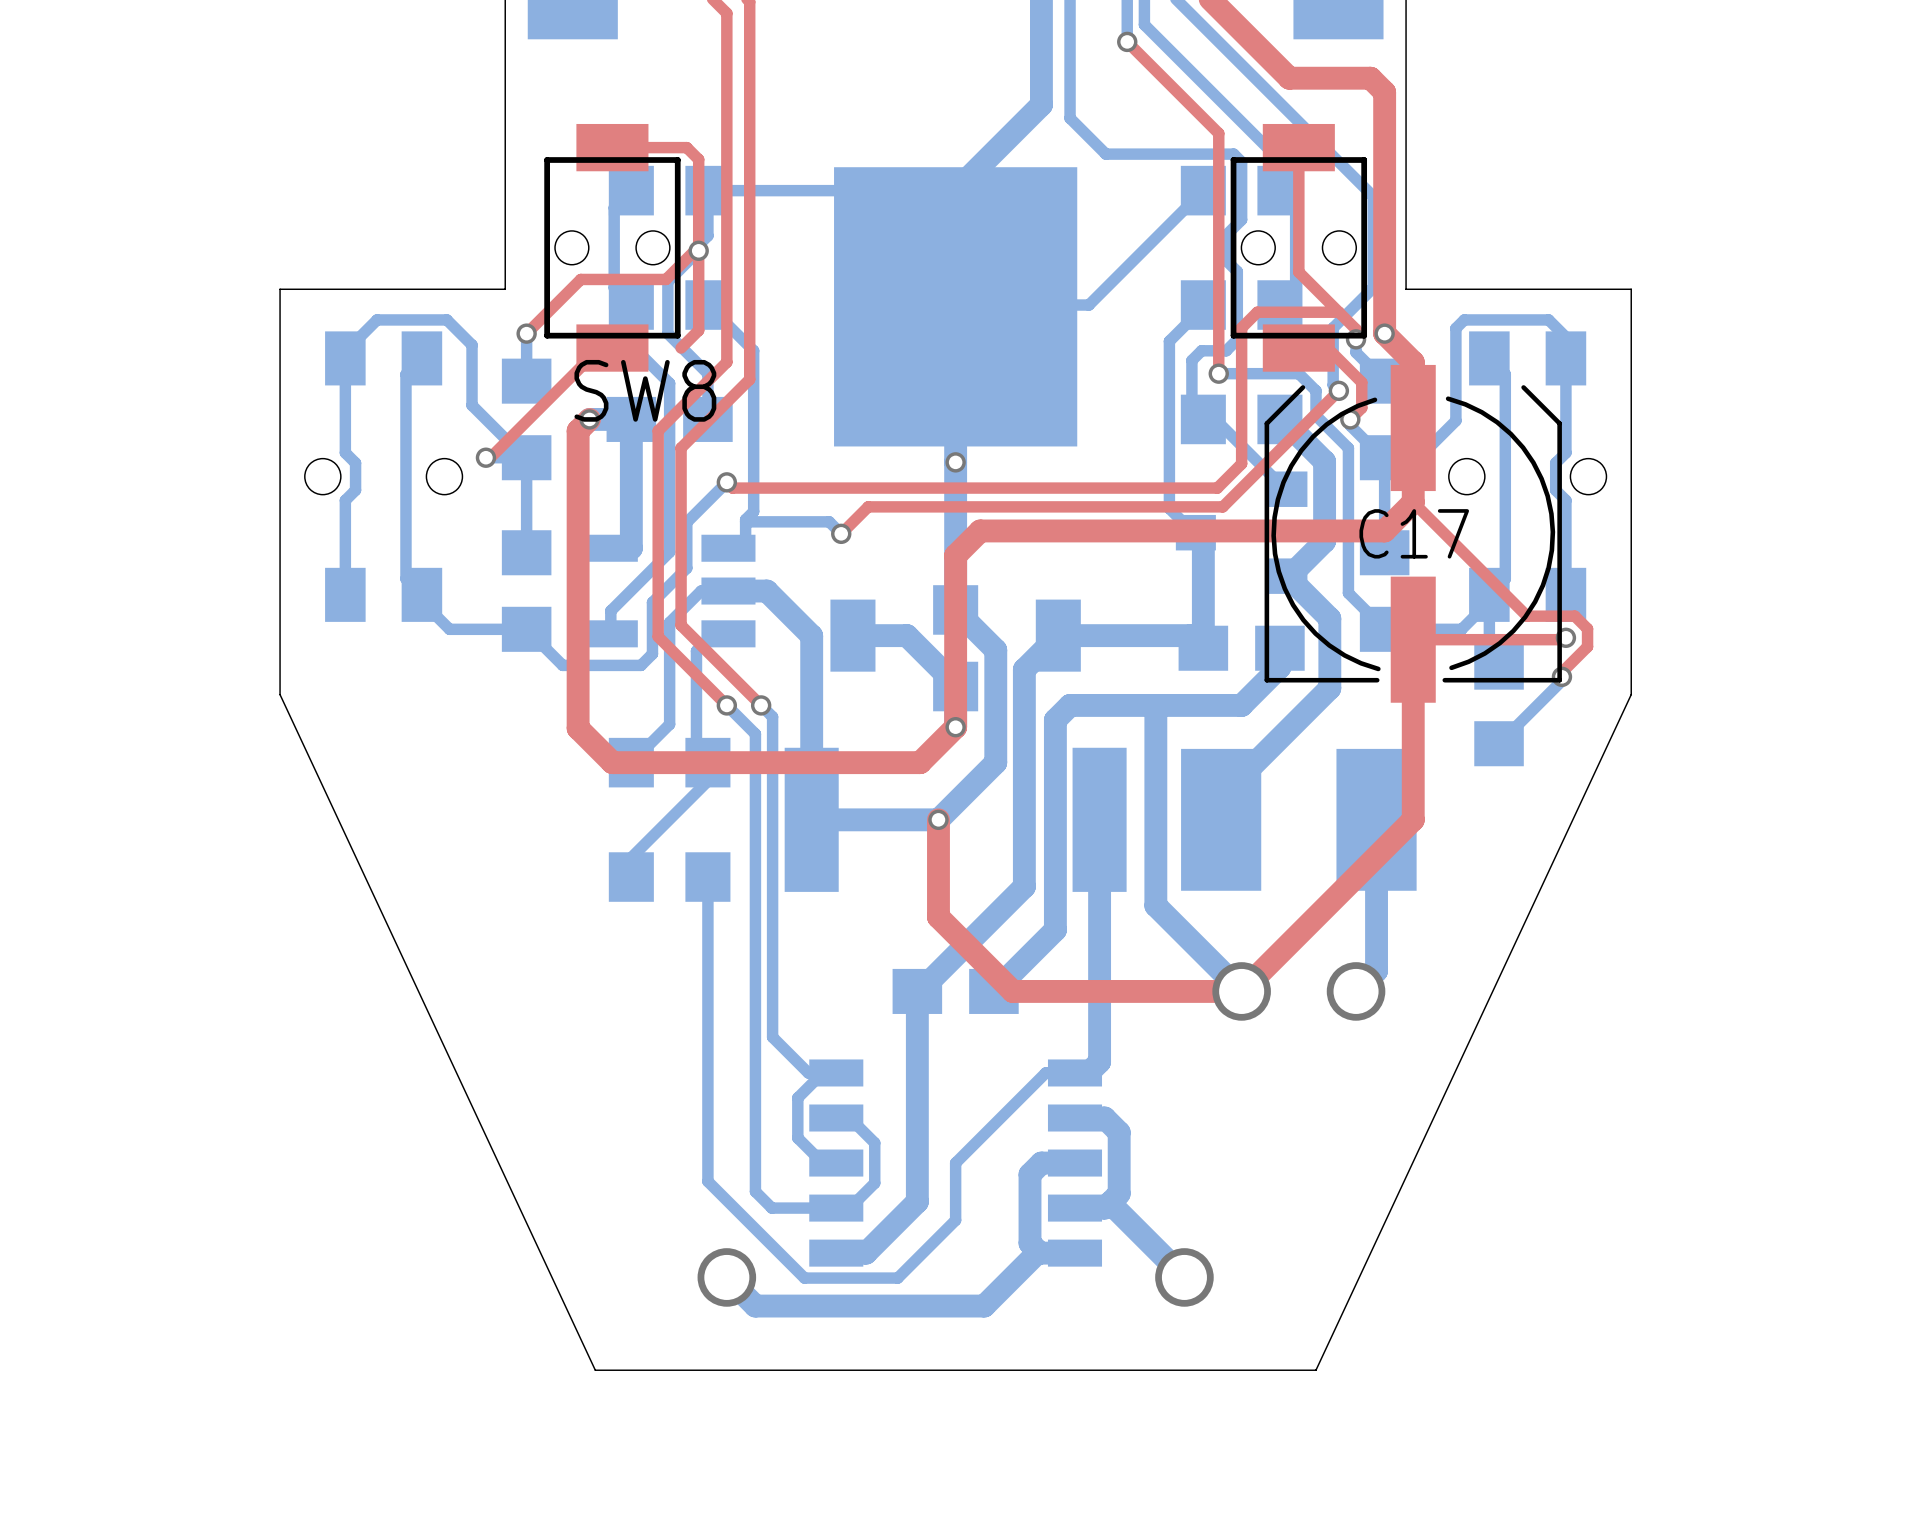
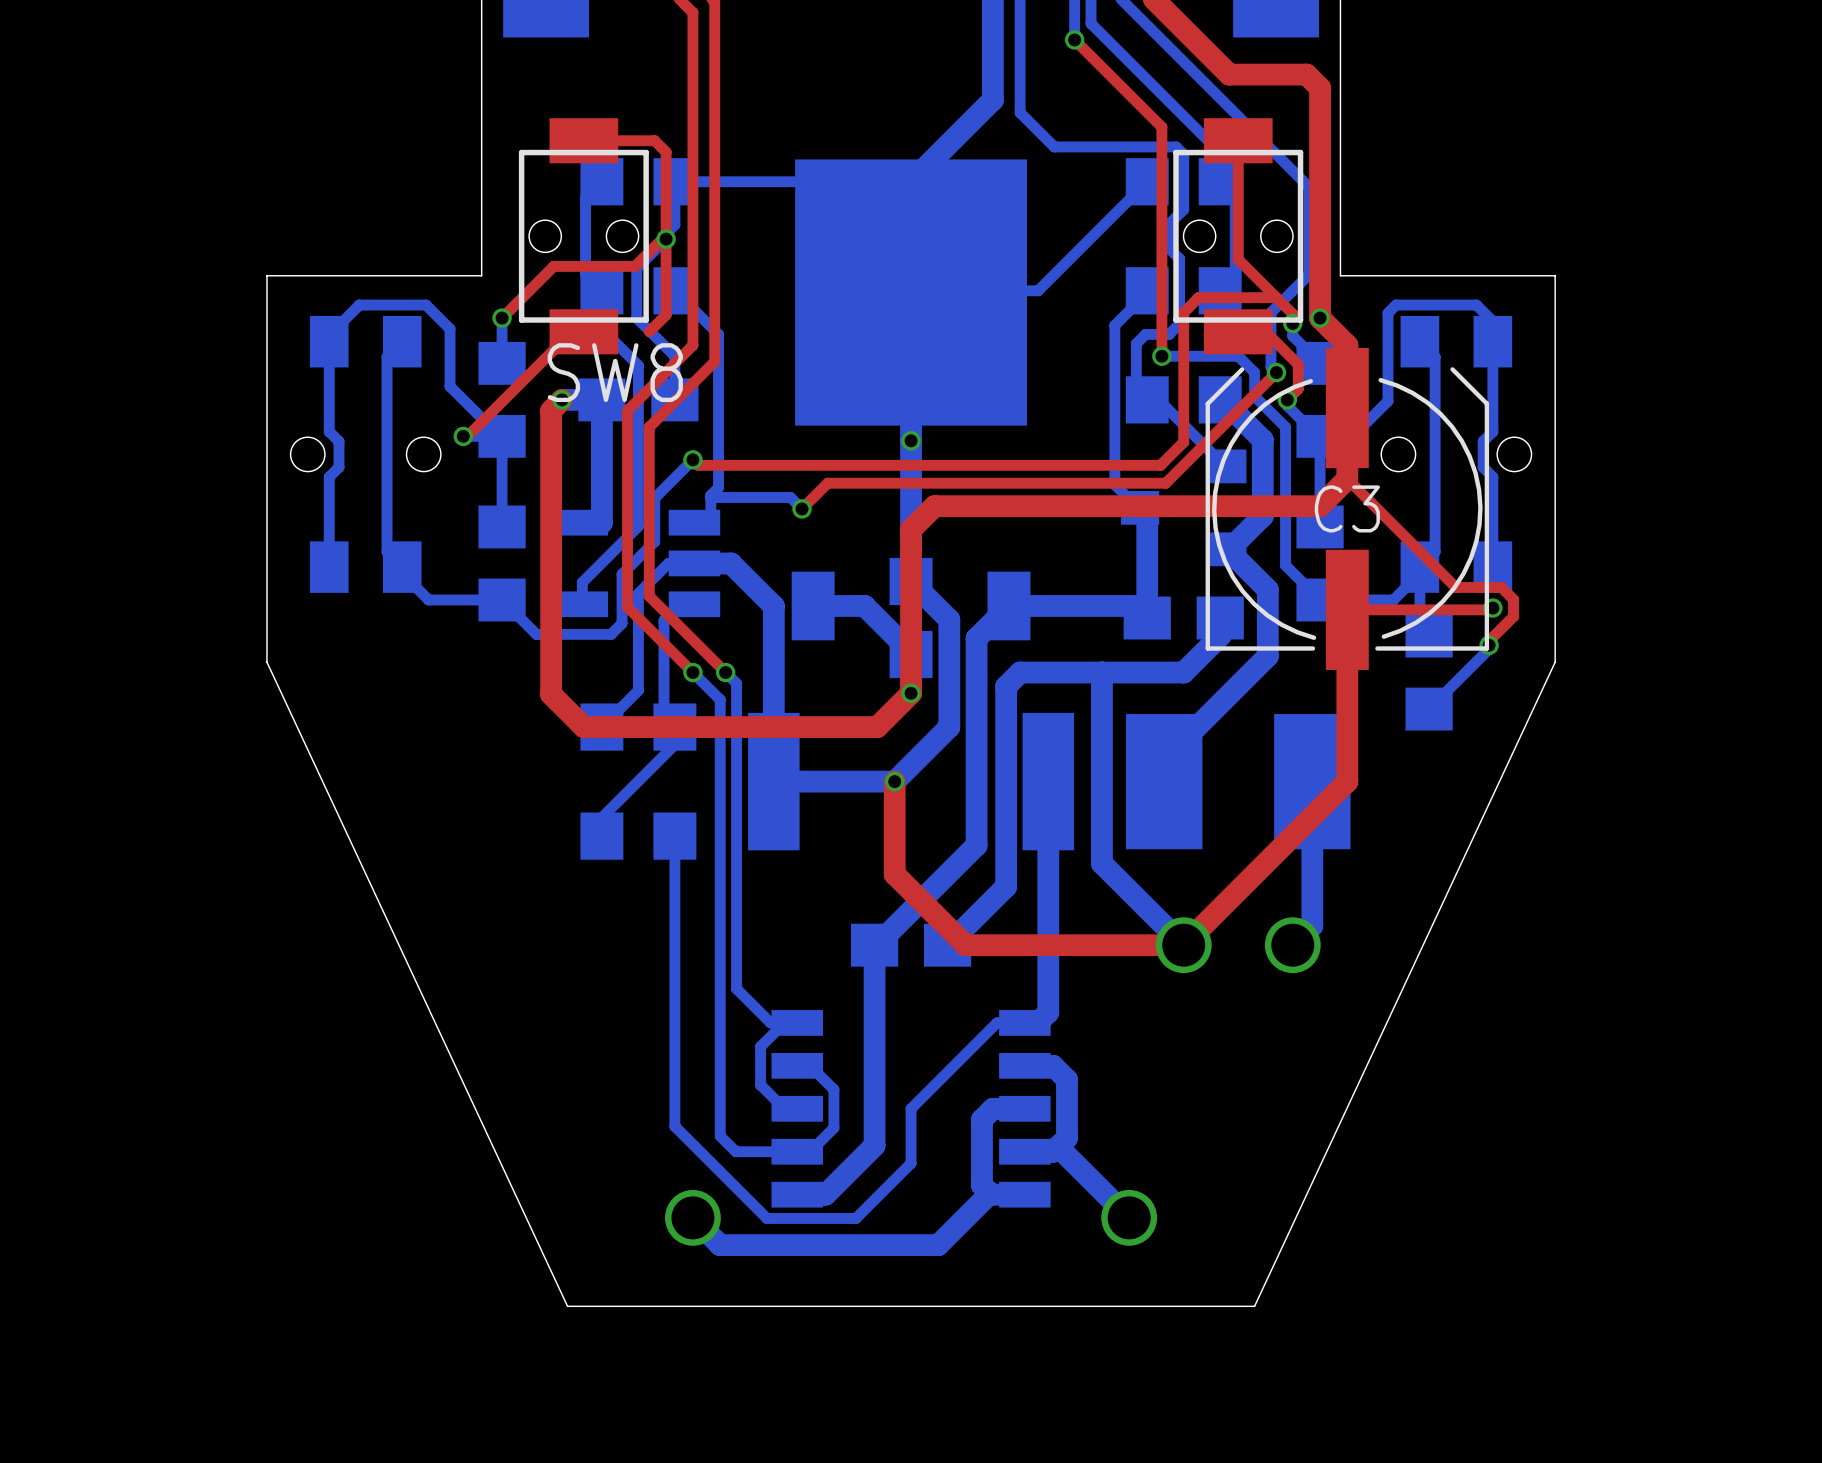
C17 name: C17 (1414, 533) -> C3 (1347, 508)

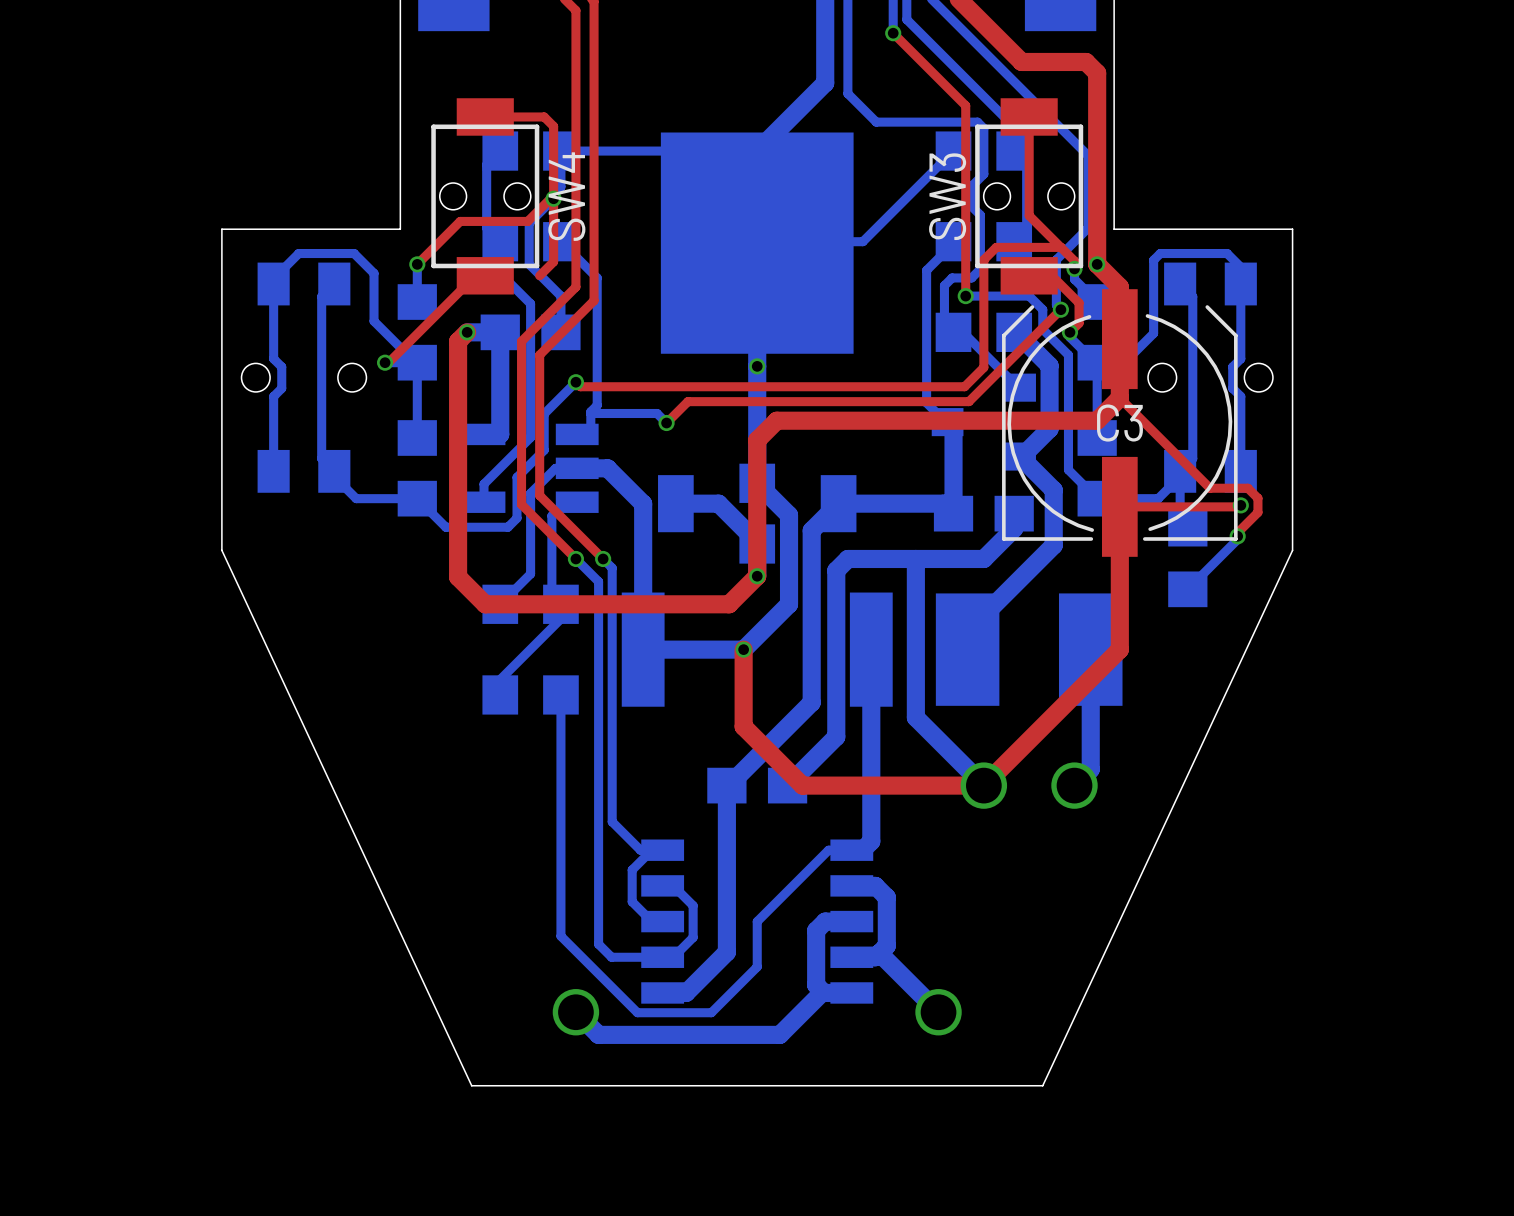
SW3 name: none -> SW3 (947, 196)
SW8 name: SW8 (615, 372) -> SW4 (566, 196)

